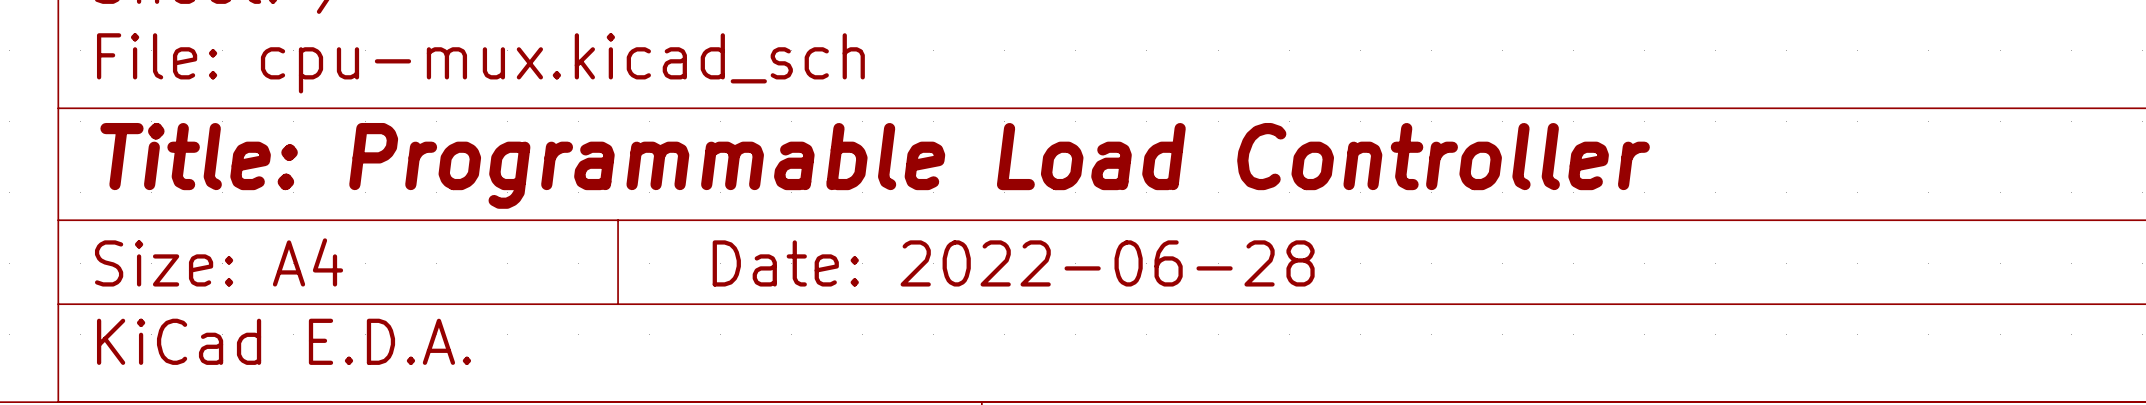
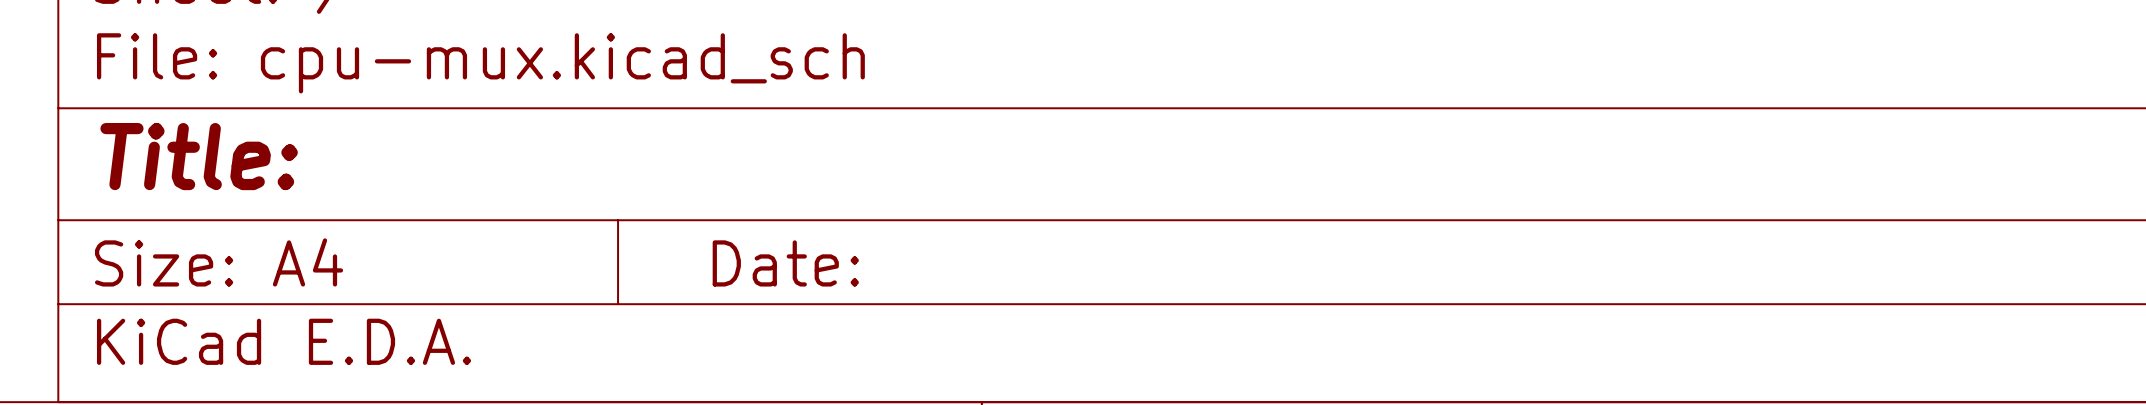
title block: Title: Programmable Load Controller (875, 165) -> Title: (199, 156)
title block: Date: 2022-06-28 (1013, 263) -> Date: (785, 263)

